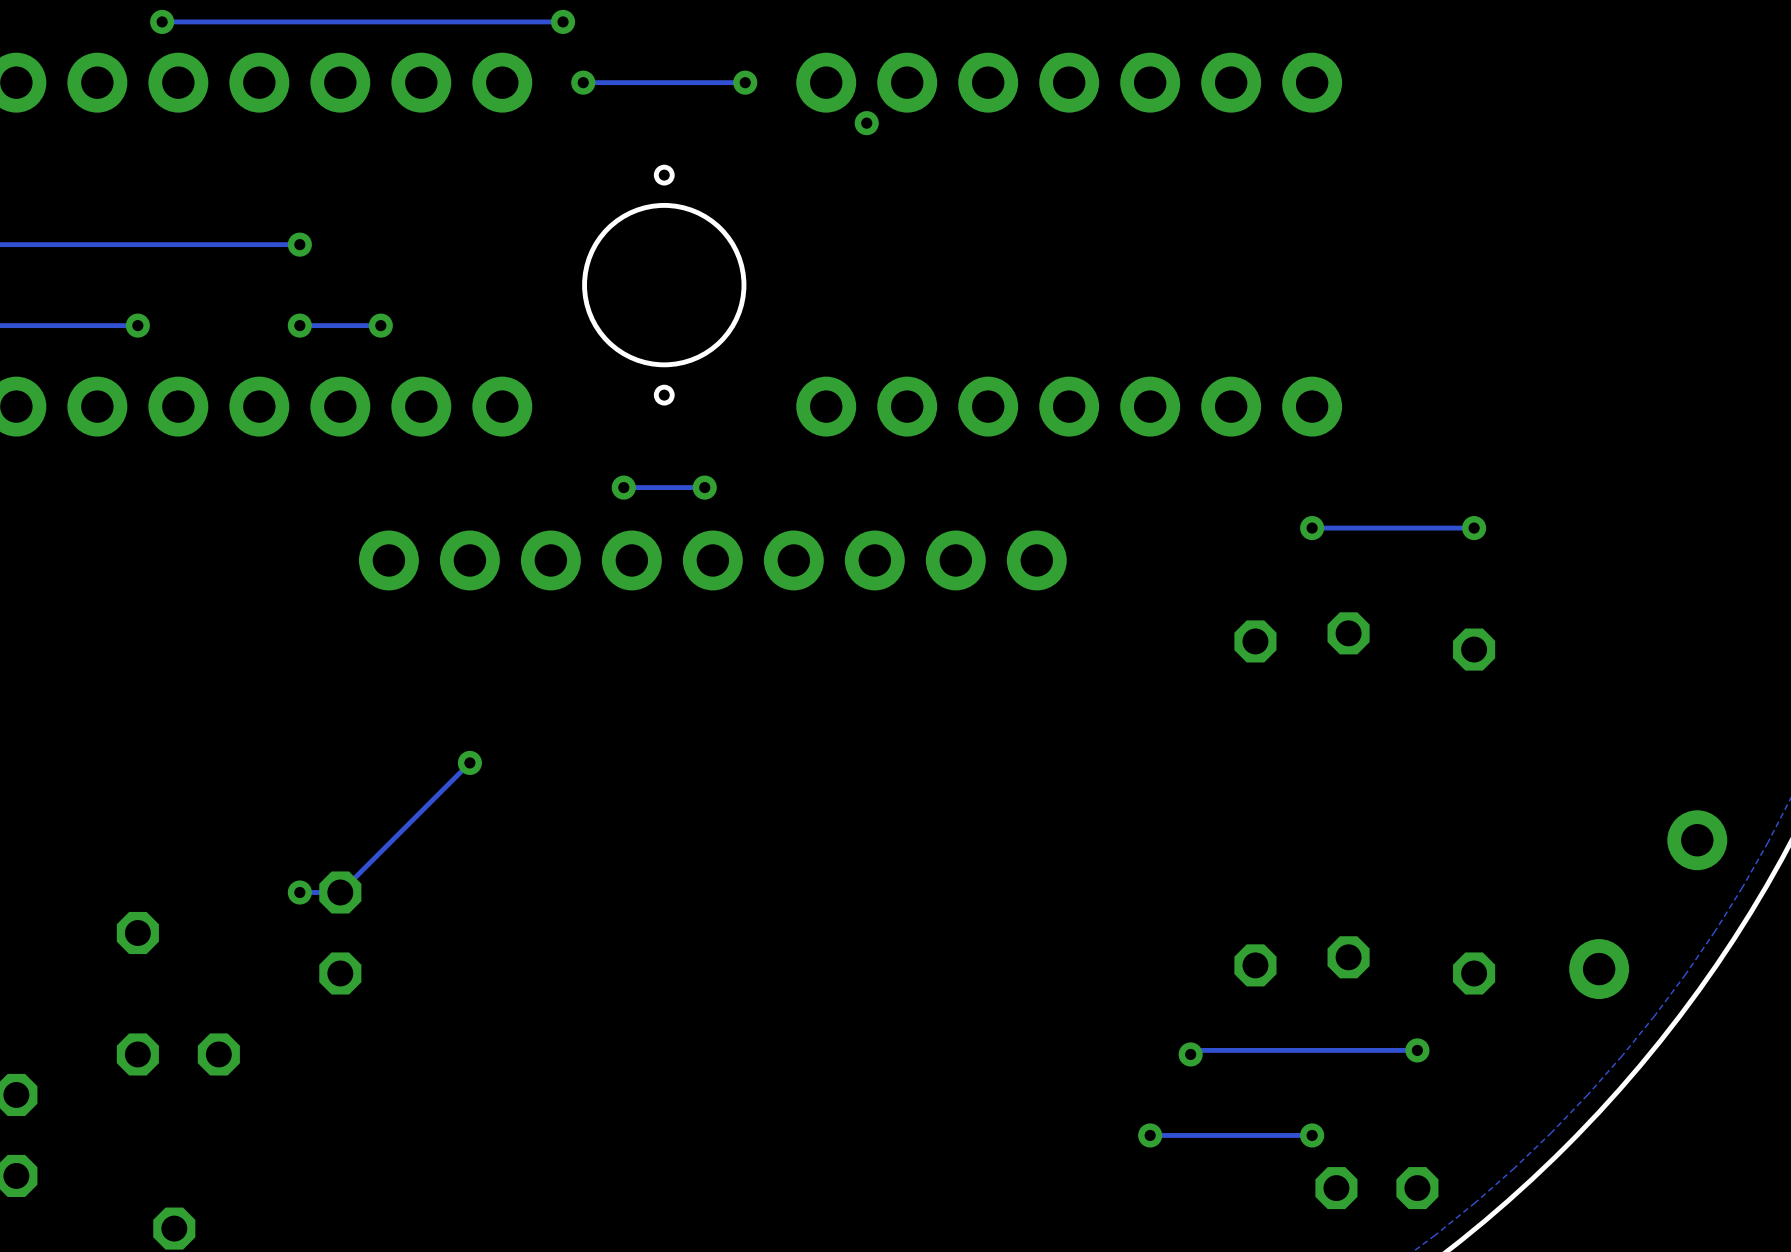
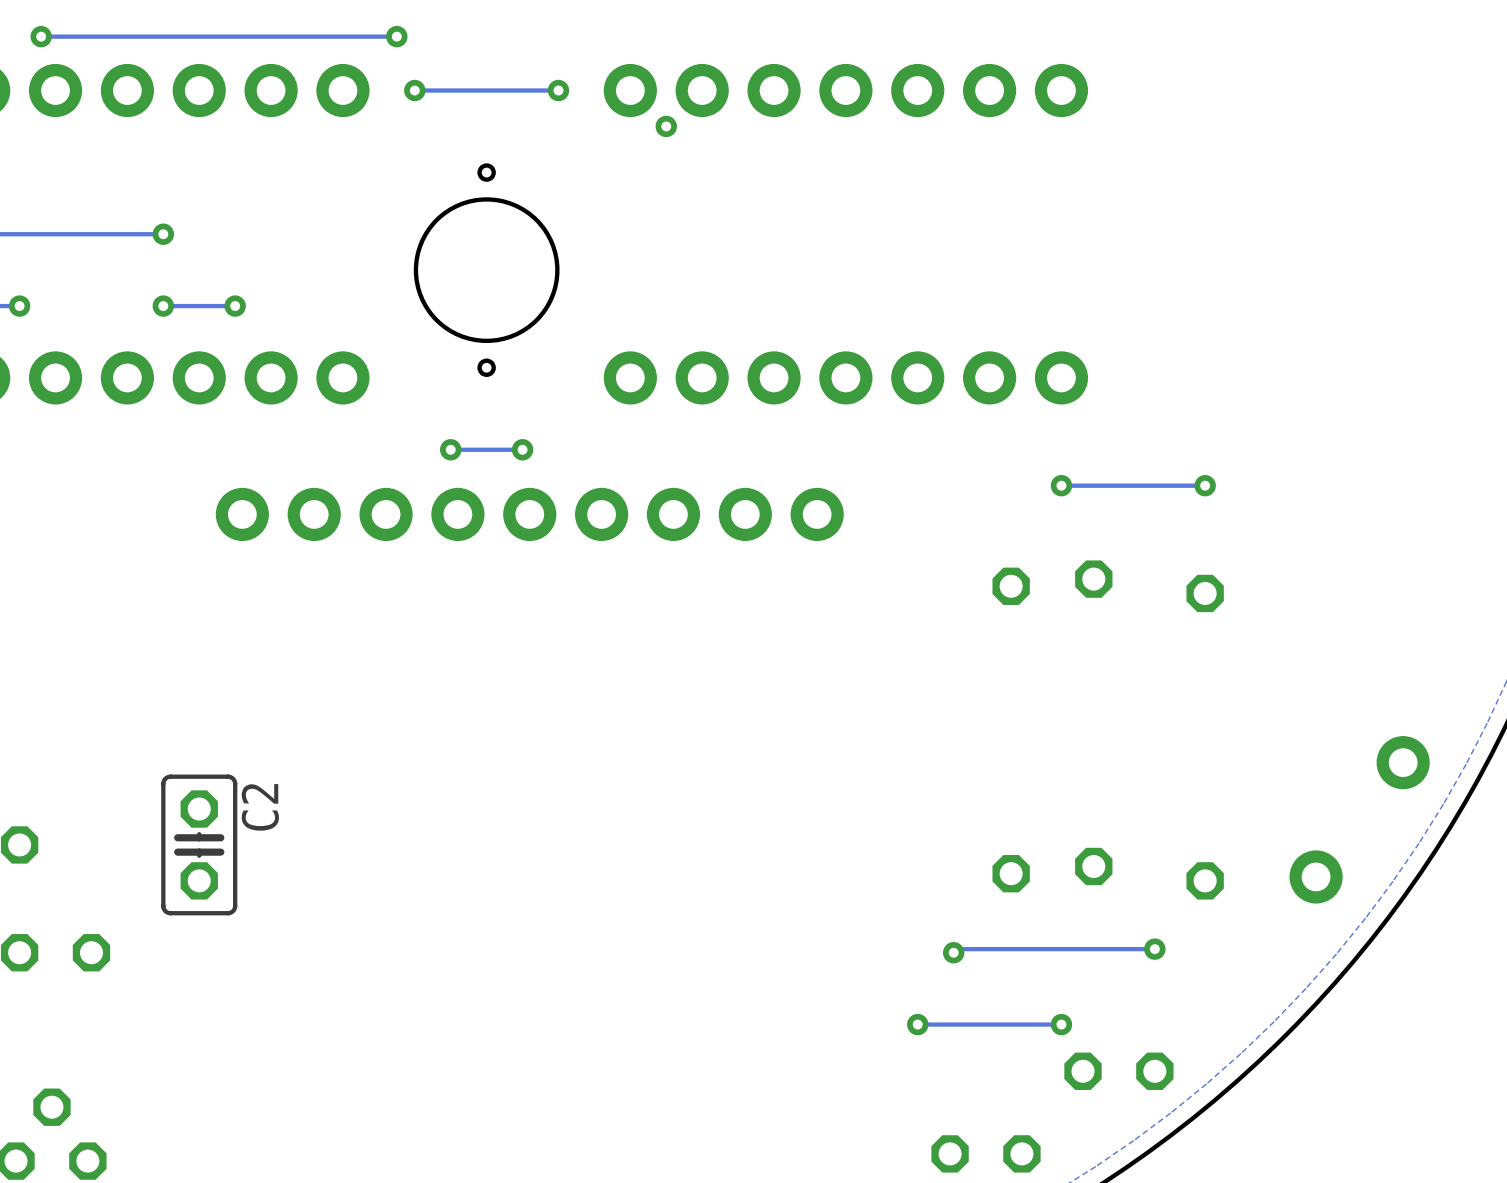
track: (469, 762) (340, 892) (299, 892) -> none
via: (469, 762) -> none
via: (299, 892) -> none
C2 side: top (340, 932) -> bottom (199, 844)

